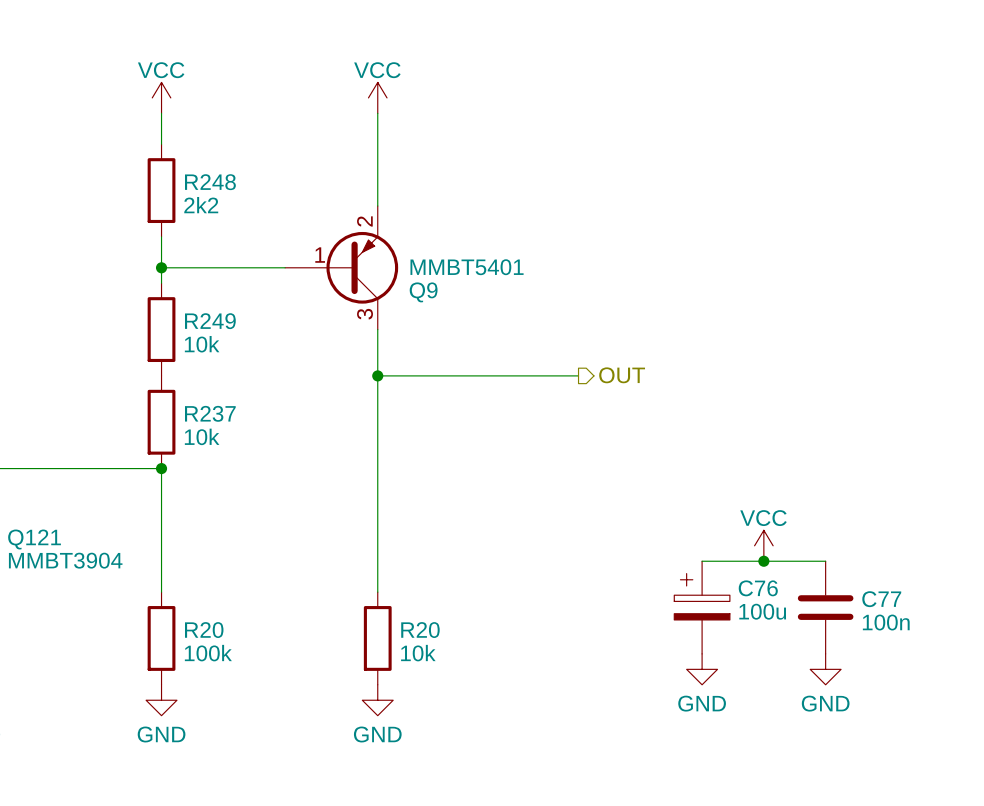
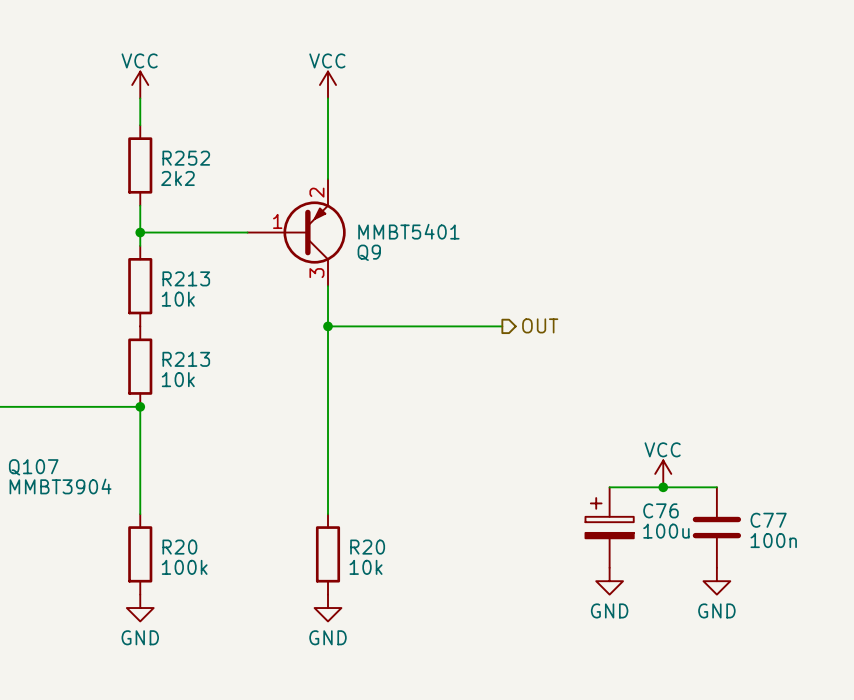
R248 name: R248 (210, 182) -> R252 (186, 158)
R249 name: R249 (210, 321) -> R213 (186, 278)
R237 name: R237 (210, 413) -> R213 (186, 359)
Q121 name: Q121 (34, 539) -> Q107 (33, 467)

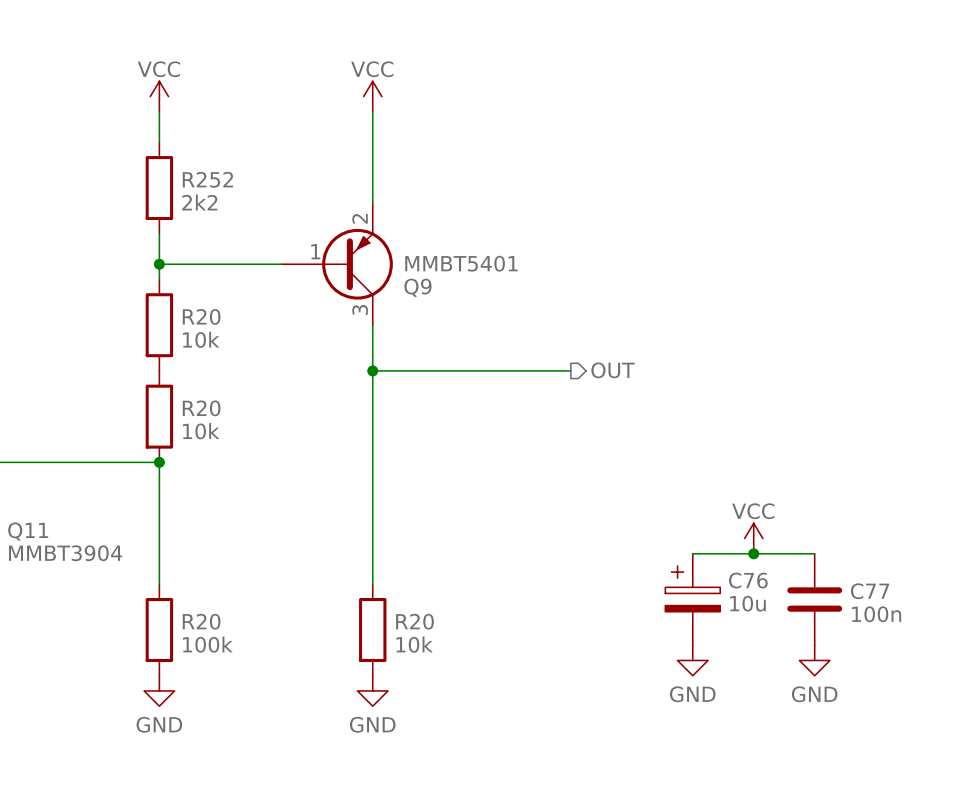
R213 name: R213 (186, 278) -> R20 (201, 316)
R213 name: R213 (186, 359) -> R20 (201, 408)
Q107 name: Q107 (33, 467) -> Q11 (28, 531)
C76 value: 100u (666, 531) -> 10u (747, 603)

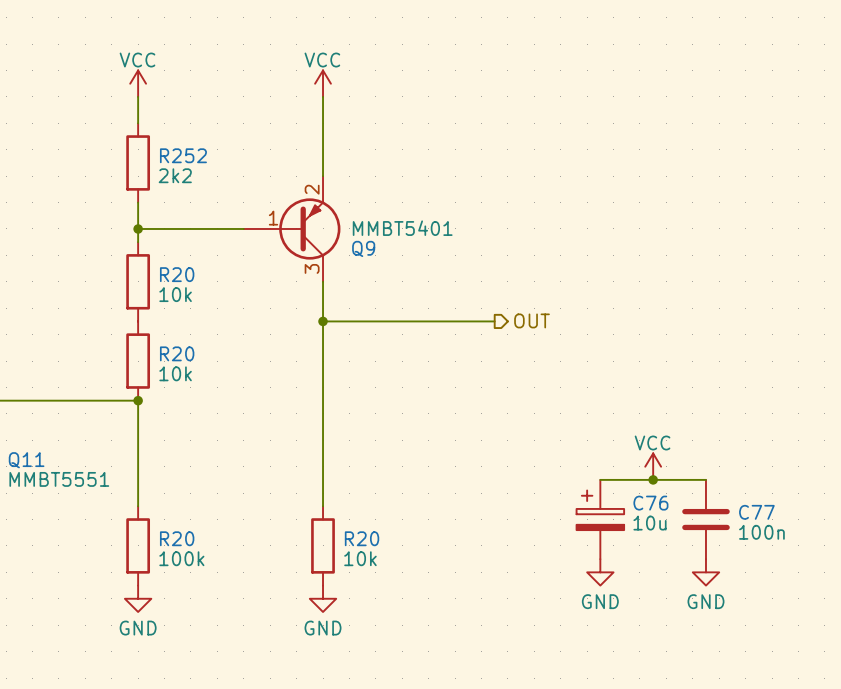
Q11 value: MMBT3904 (65, 553) -> MMBT5551 (59, 479)

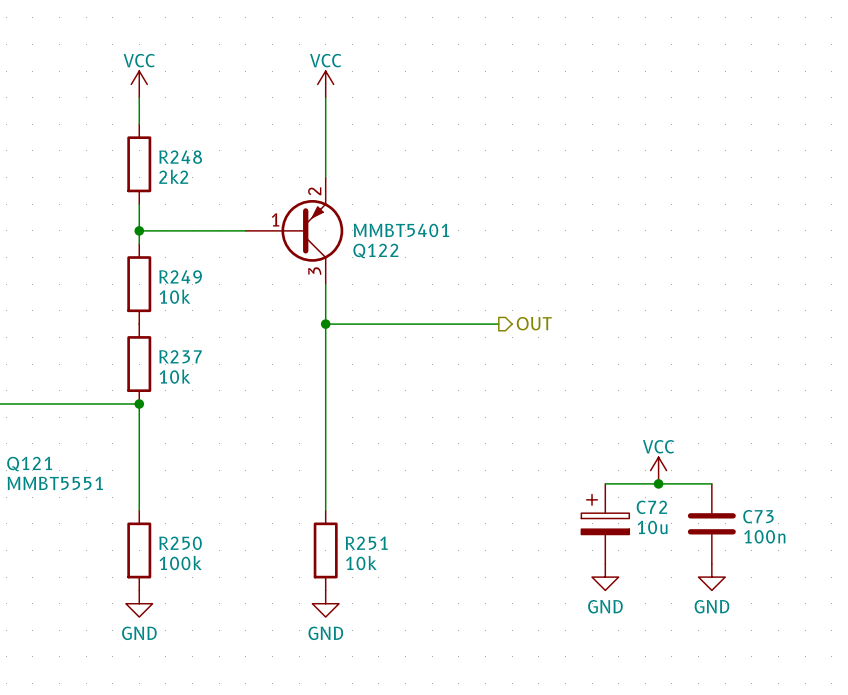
R252 name: R252 (183, 155) -> R248 (180, 157)
Q9 name: Q9 (363, 248) -> Q122 (375, 251)
R20 name: R20 (177, 274) -> R249 (180, 276)
R20 name: R20 (177, 353) -> R237 (180, 356)
Q11 name: Q11 (26, 460) -> Q121 (29, 464)
C76 name: C76 (650, 503) -> C72 (651, 507)
C77 name: C77 (756, 512) -> C73 (758, 516)
R20 name: R20 (177, 538) -> R250 (180, 543)
R20 name: R20 (362, 538) -> R251 (366, 543)

